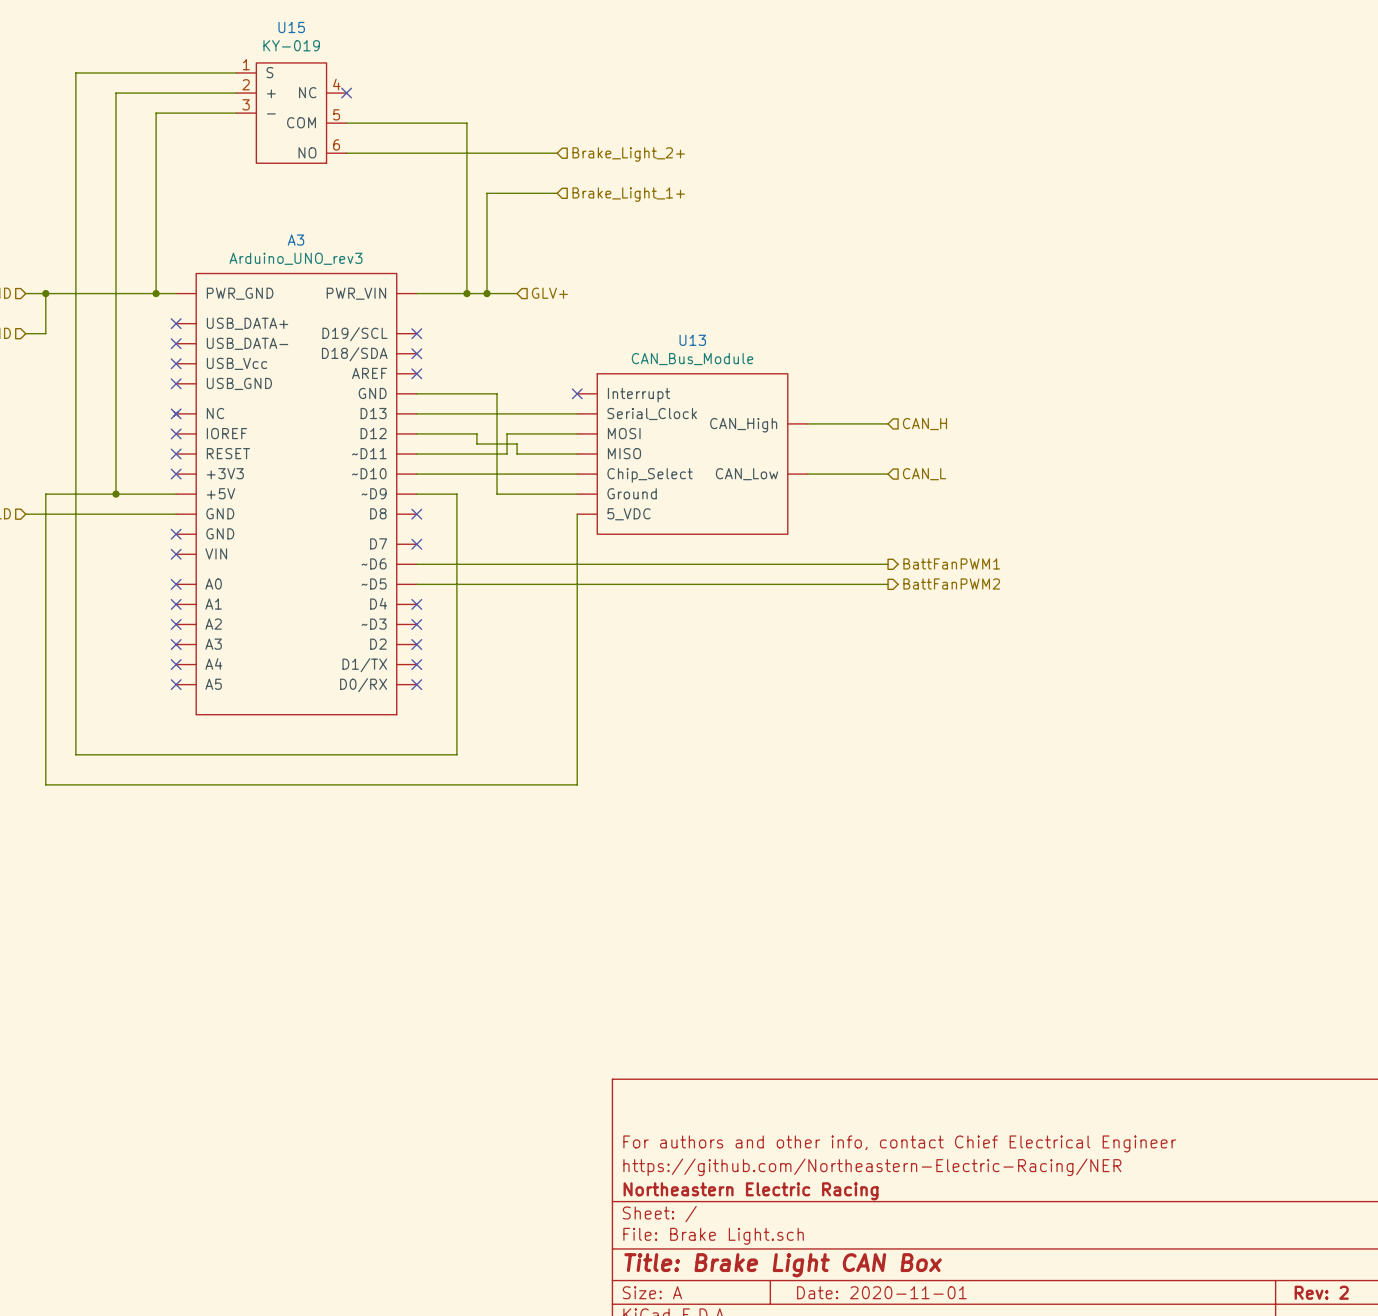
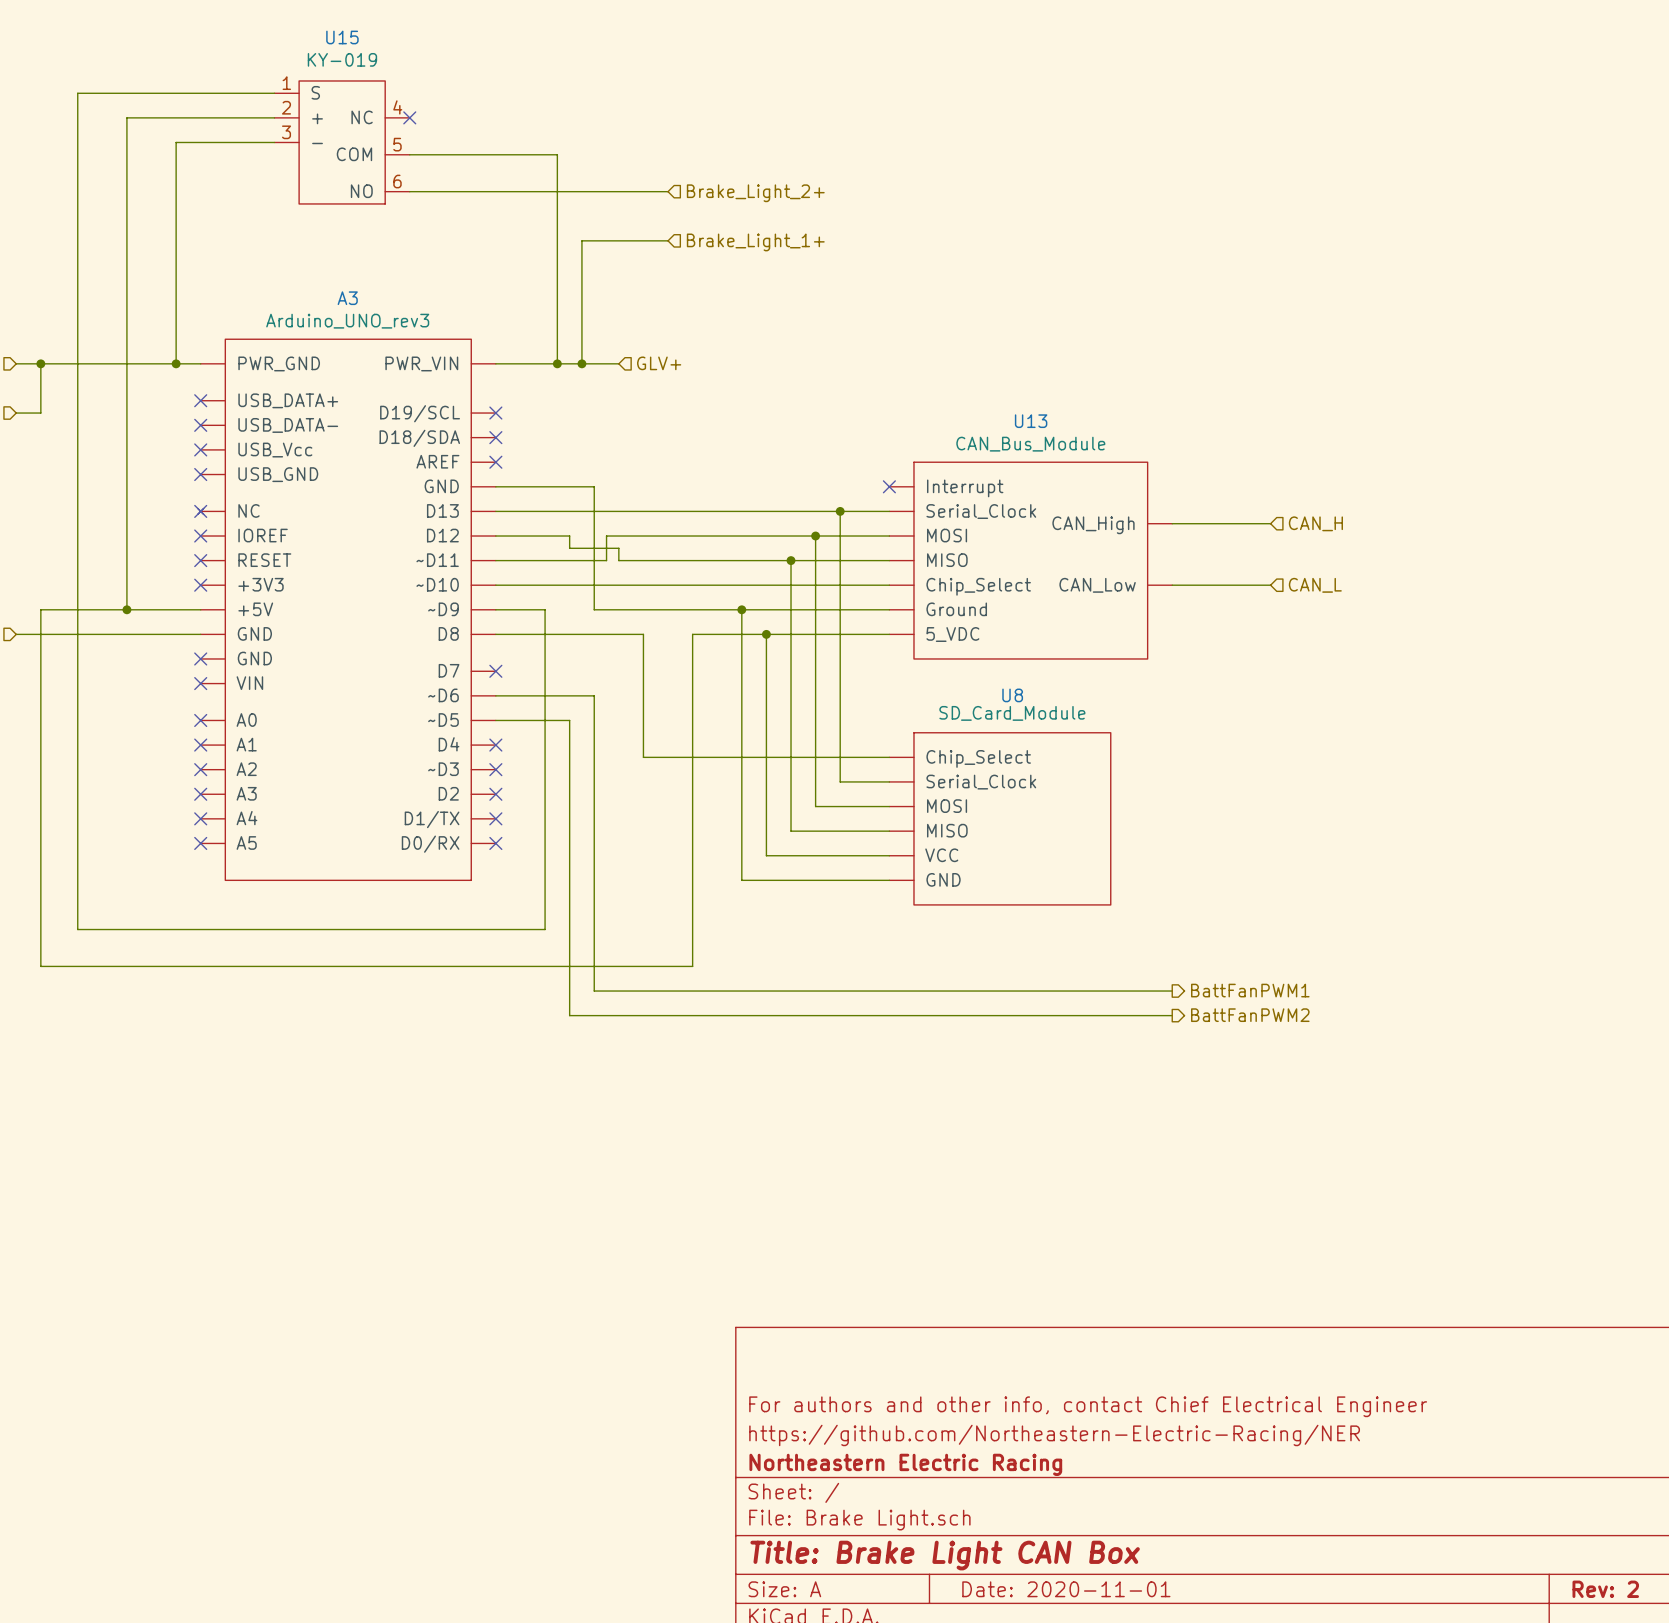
no-connect mark: (577, 393) -> none
no-connect mark: none -> (889, 486)
wire: none -> (692, 511) (889, 511)
wire: none -> (840, 511) (840, 781) (889, 781)
junction: none -> (840, 511)
wire: (807, 423) (888, 423) -> (1172, 523) (1270, 523)
hierarchical label position: CAN_H (924, 424) -> CAN_H (1315, 523)
wire: none -> (692, 536) (889, 536)
wire: none -> (815, 536) (815, 806) (889, 806)
junction: none -> (815, 536)
wire: none -> (692, 560) (889, 560)
wire: none -> (791, 560) (791, 831) (889, 831)
junction: none -> (791, 560)
U13 position: (692, 454) -> (1030, 560)
wire: none -> (692, 585) (889, 585)
wire: (807, 474) (888, 474) -> (1172, 585) (1270, 585)
hierarchical label position: CAN_L (924, 474) -> CAN_L (1315, 585)
wire: none -> (692, 609) (889, 609)
wire: none -> (741, 609) (741, 880) (889, 880)
junction: none -> (741, 609)
wire: none -> (495, 634) (643, 634) (643, 757) (889, 757)
no-connect mark: (416, 514) -> none
wire: none -> (692, 634) (889, 634)
wire: none -> (766, 634) (766, 855) (889, 855)
junction: none -> (766, 634)
hierarchical label: BattFanPWM1 (951, 563) -> none
wire: (497, 564) (888, 564) -> (594, 695) (594, 991) (1172, 991)
hierarchical label: BattFanPWM2 (951, 583) -> none
wire: (476, 584) (888, 584) -> (569, 720) (569, 1015) (1172, 1015)
U8: none -> SD_Card_Module (1000, 818)
hierarchical label: none -> BattFanPWM1 (1250, 990)
hierarchical label: none -> BattFanPWM2 (1250, 1015)

